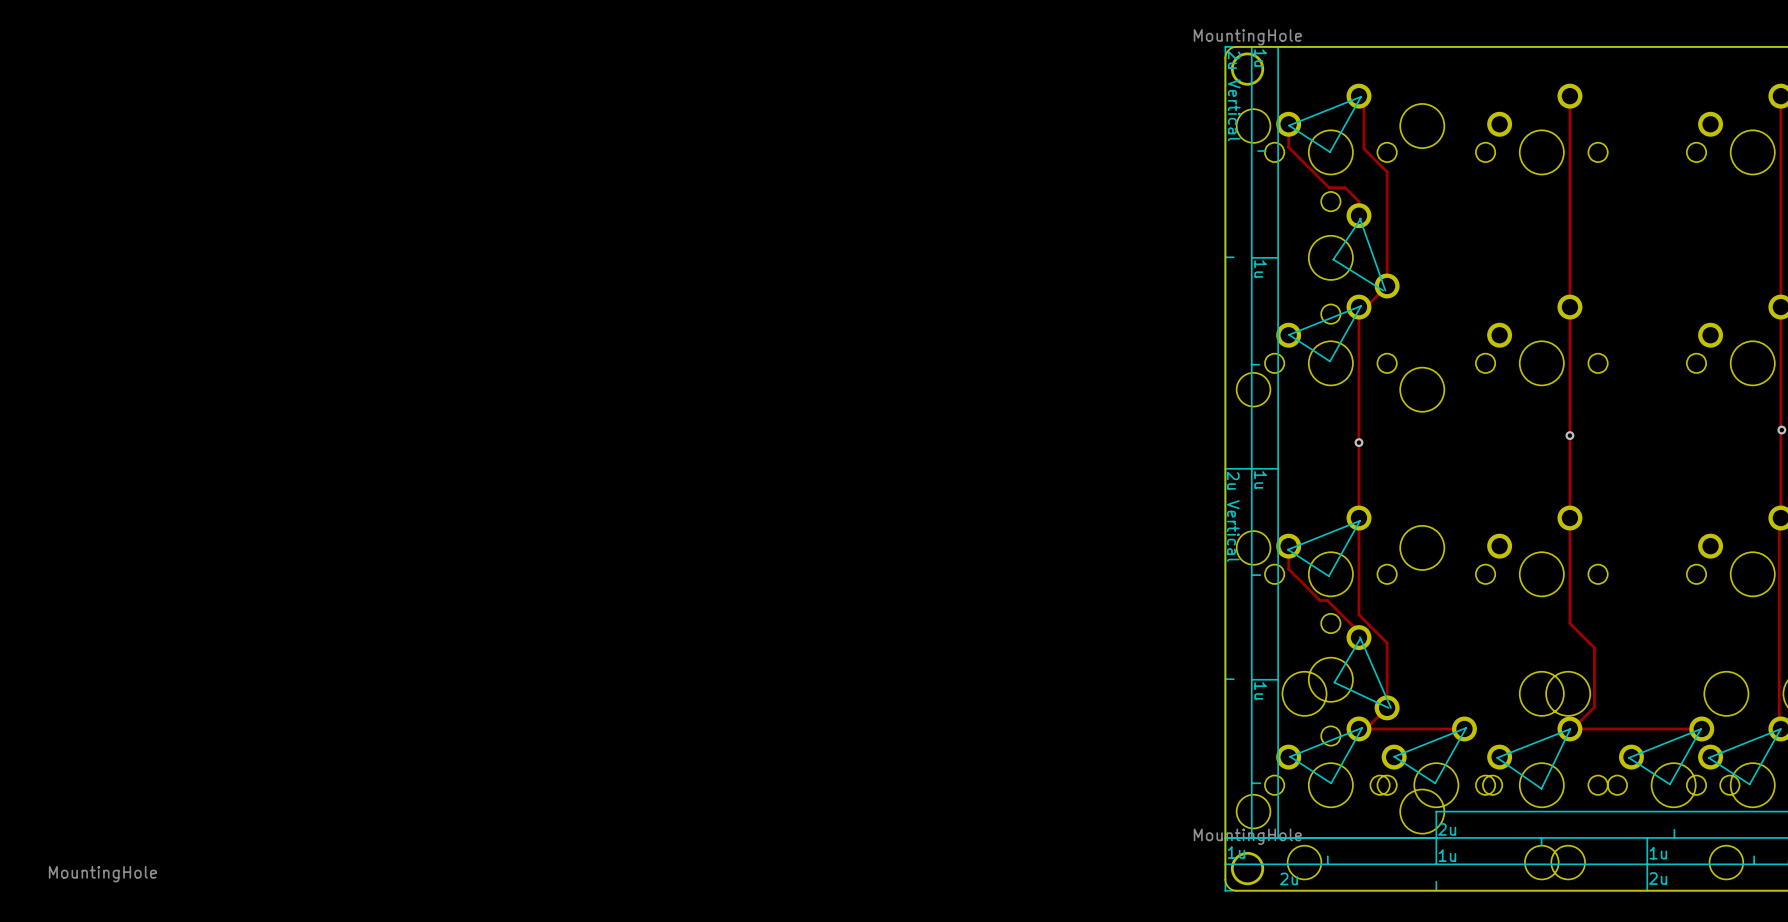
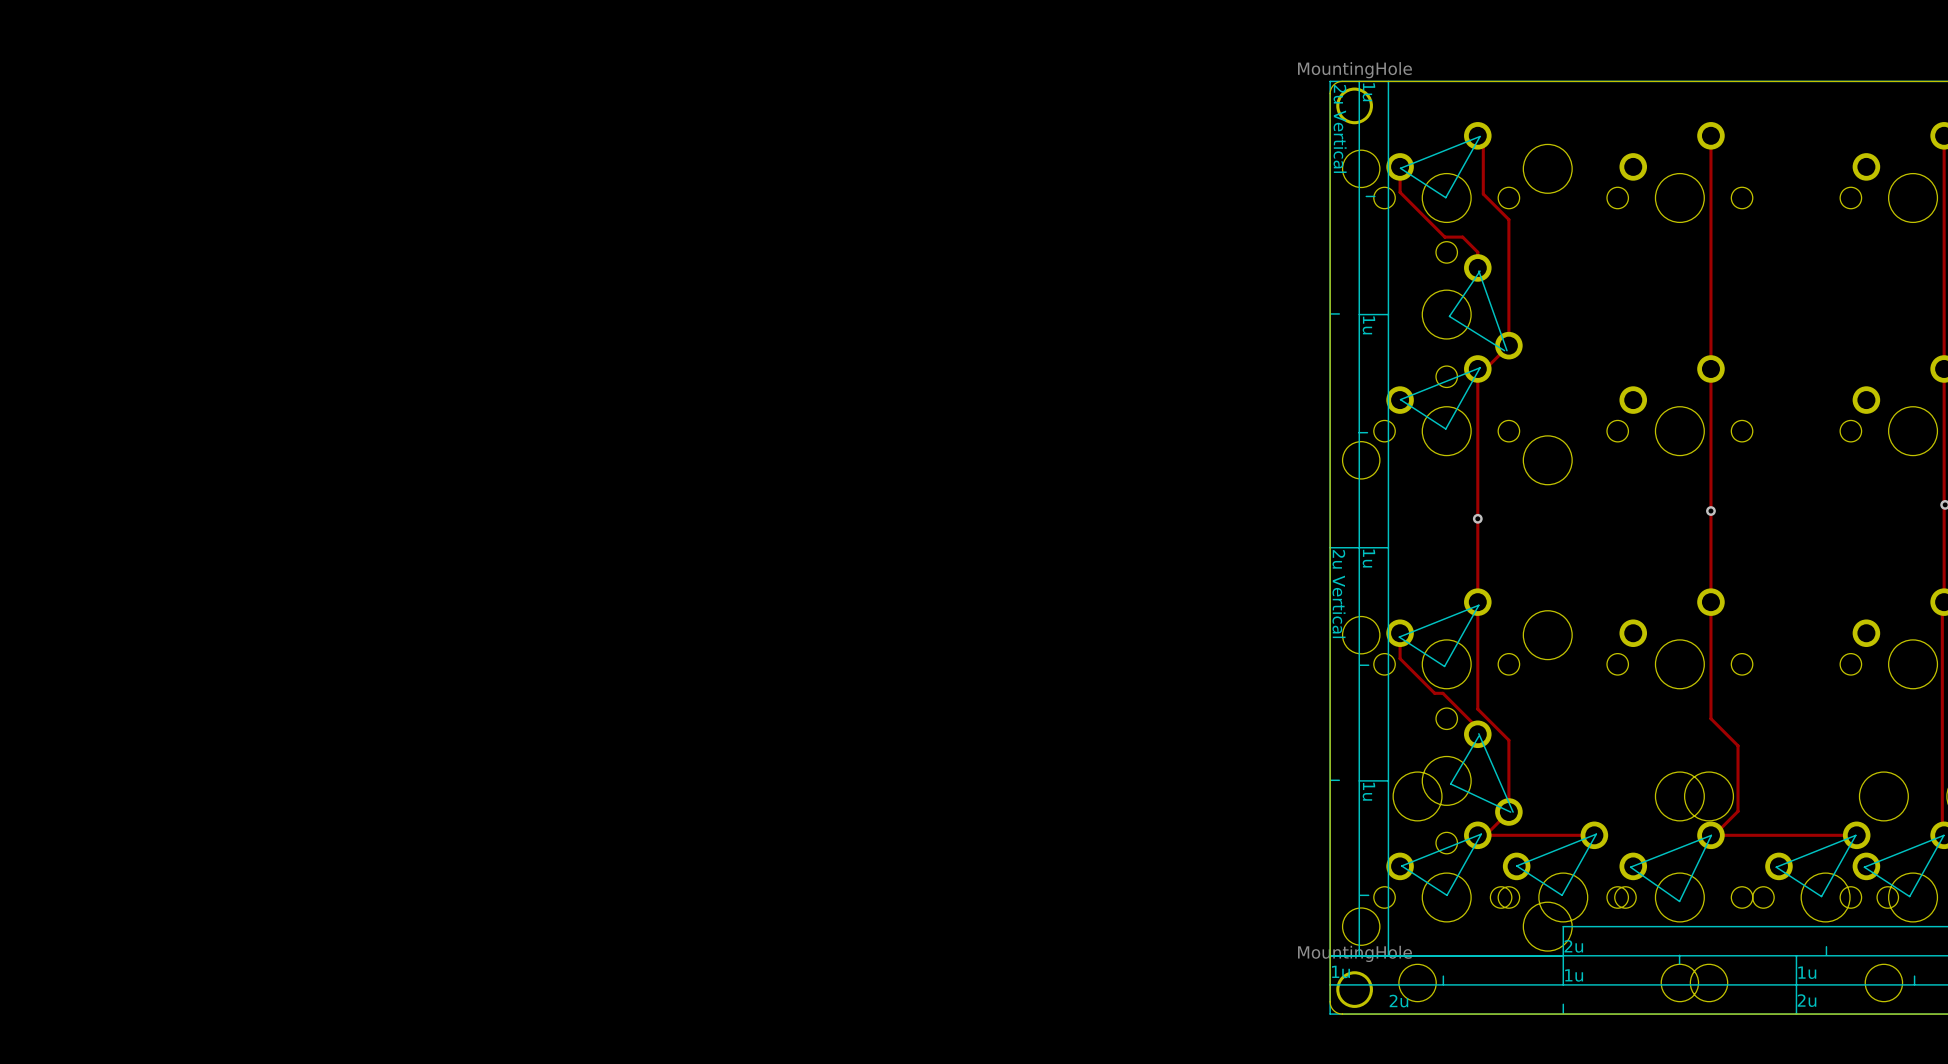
text: MountingHole (102, 874) -> none

